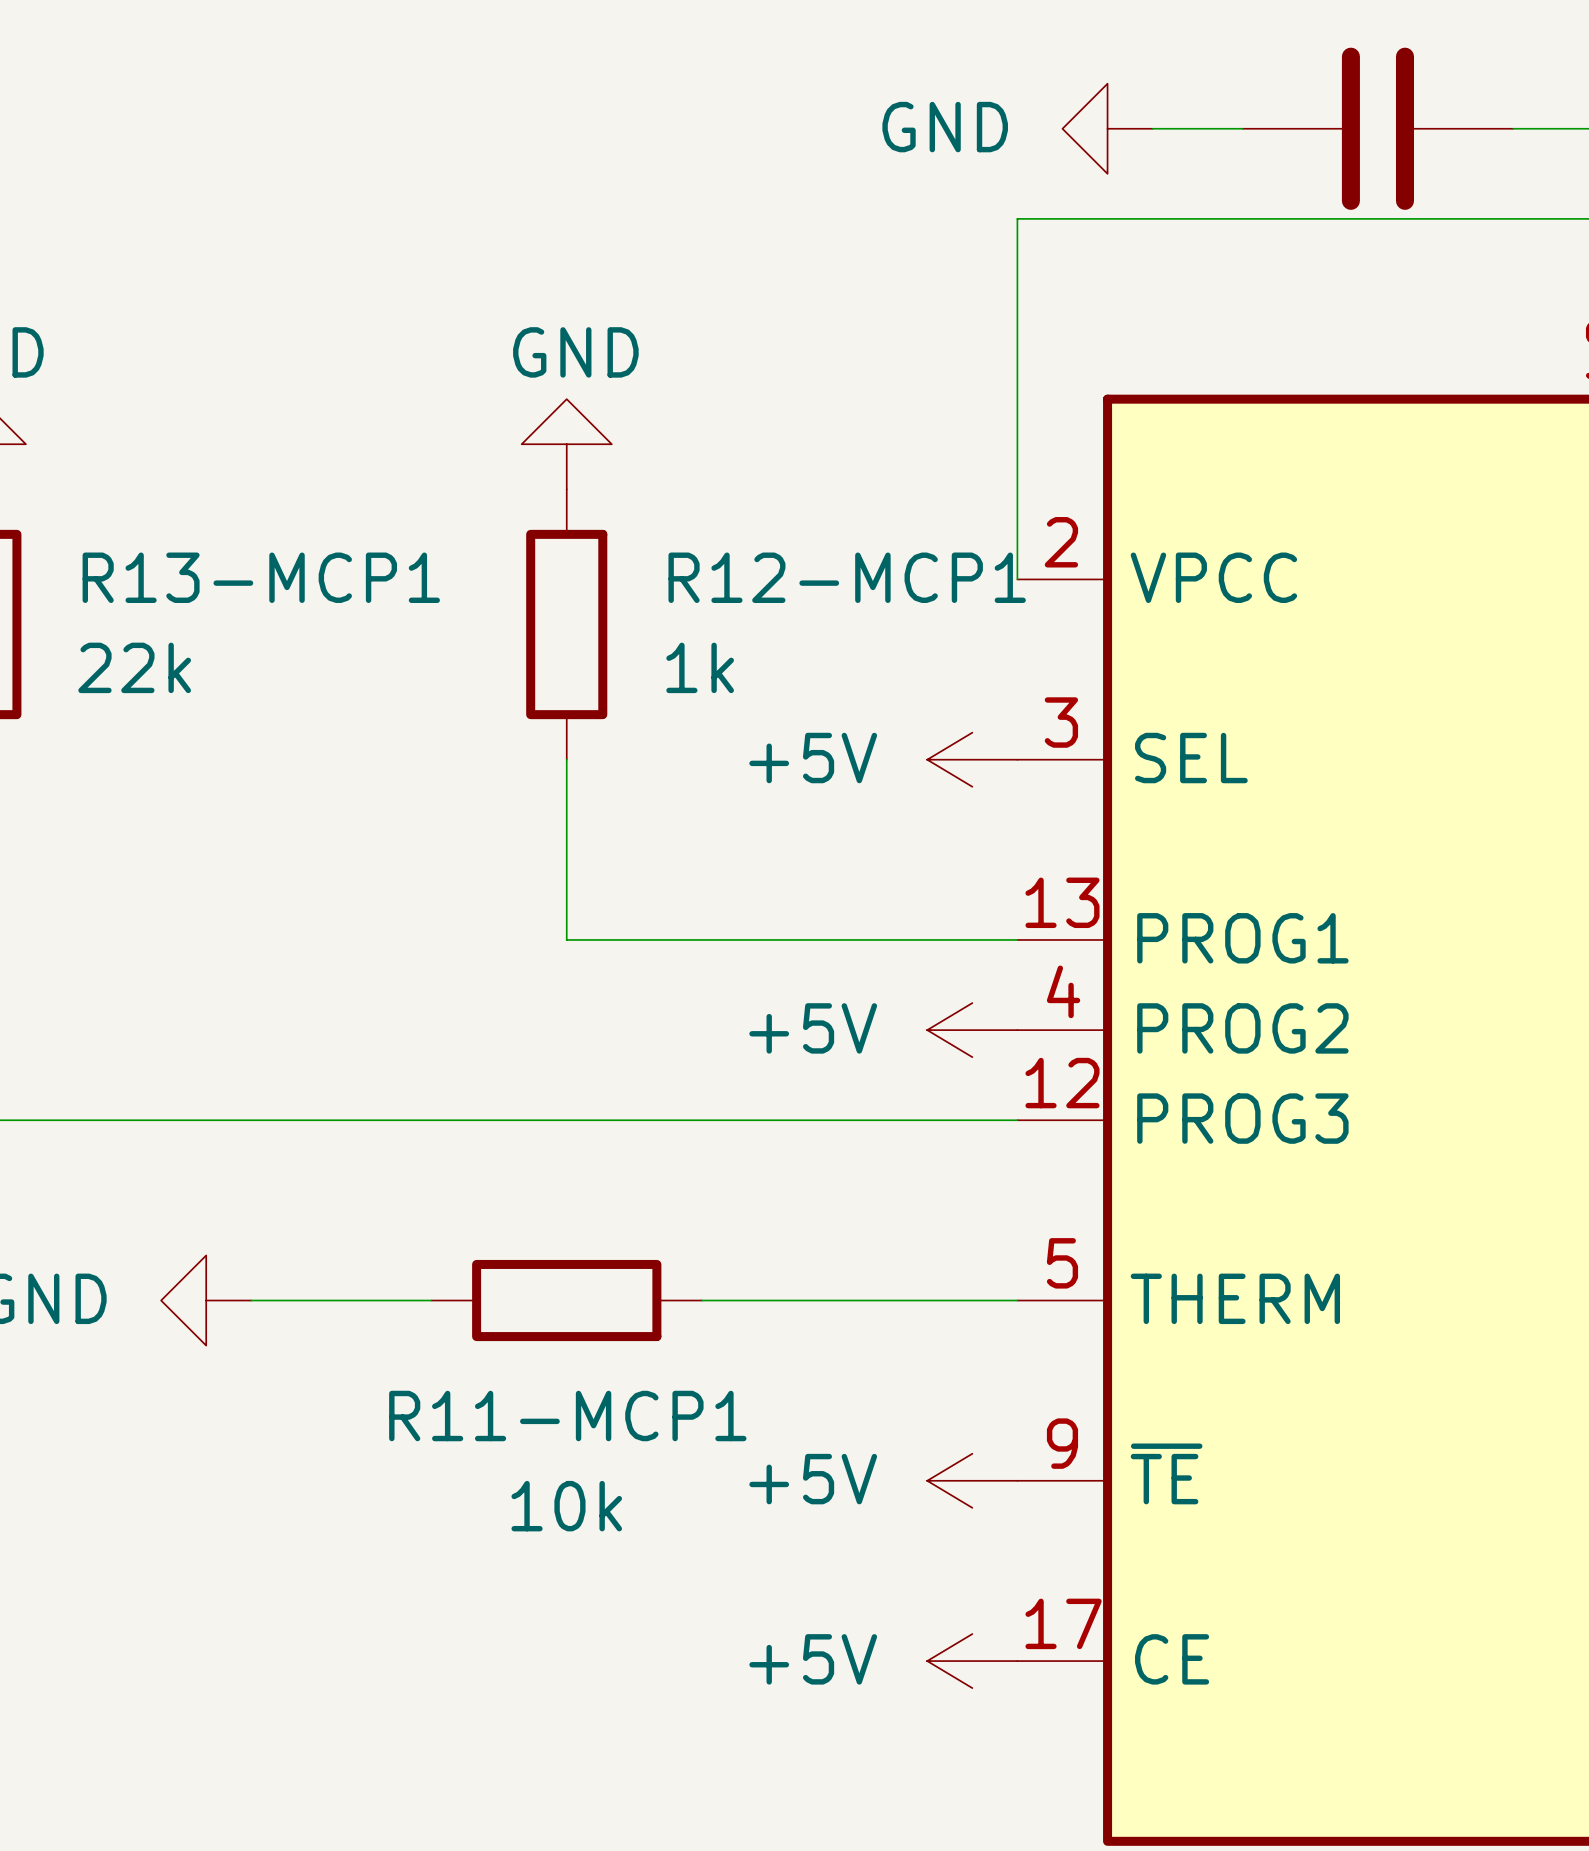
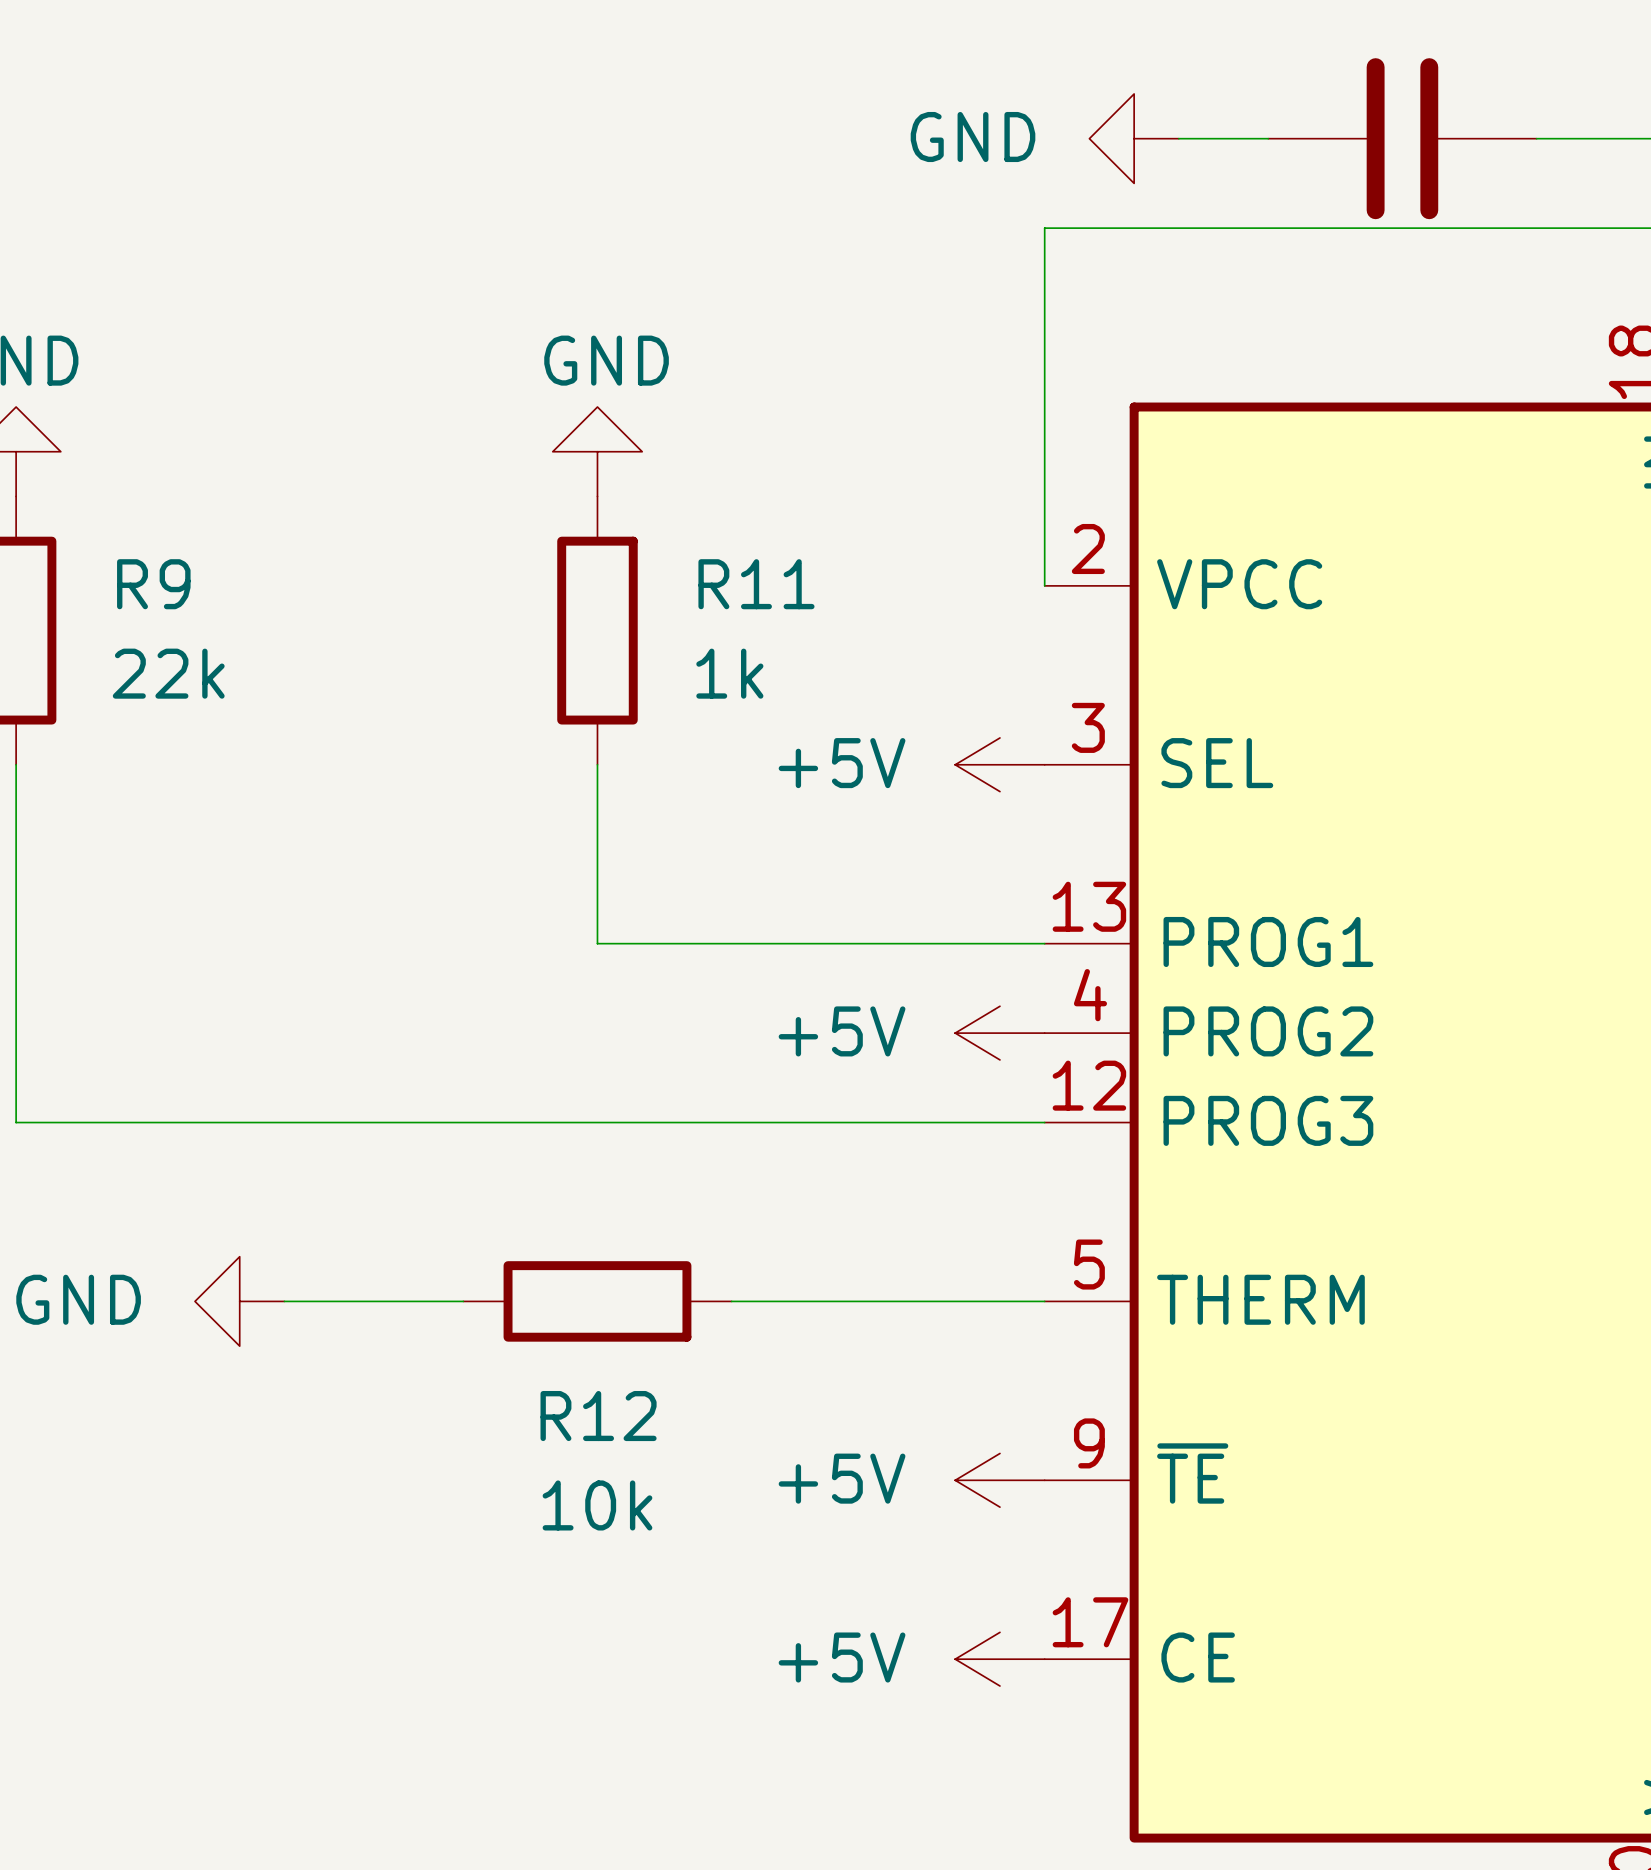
R13-MCP1 name: R13-MCP1 (261, 577) -> R9 (153, 584)
R12-MCP1 name: R12-MCP1 (847, 577) -> R11 (756, 584)
R11-MCP1 name: R11-MCP1 (567, 1416) -> R12 (598, 1416)

